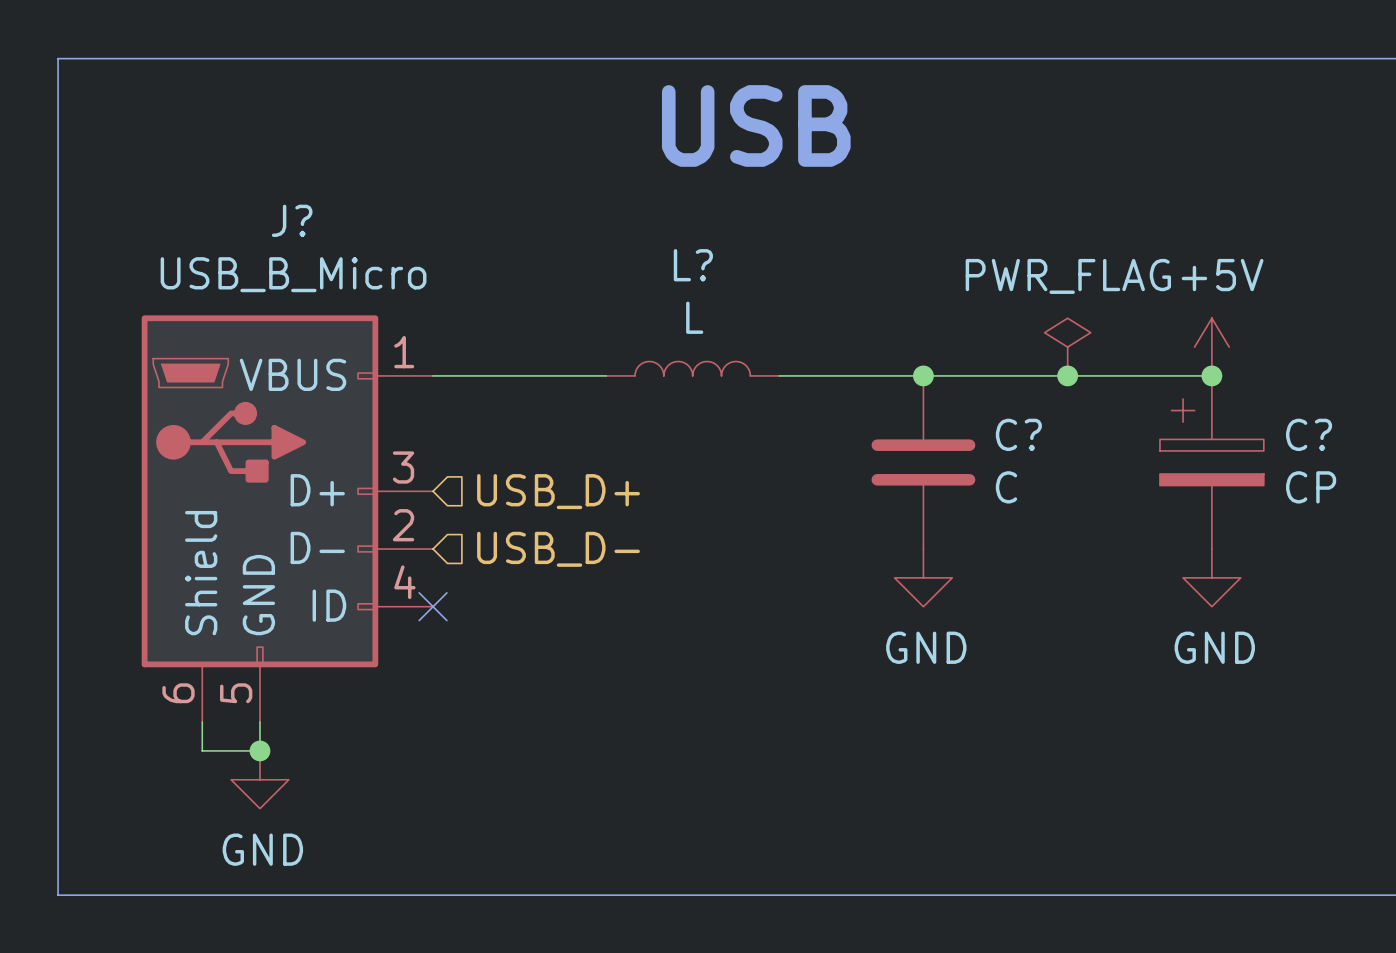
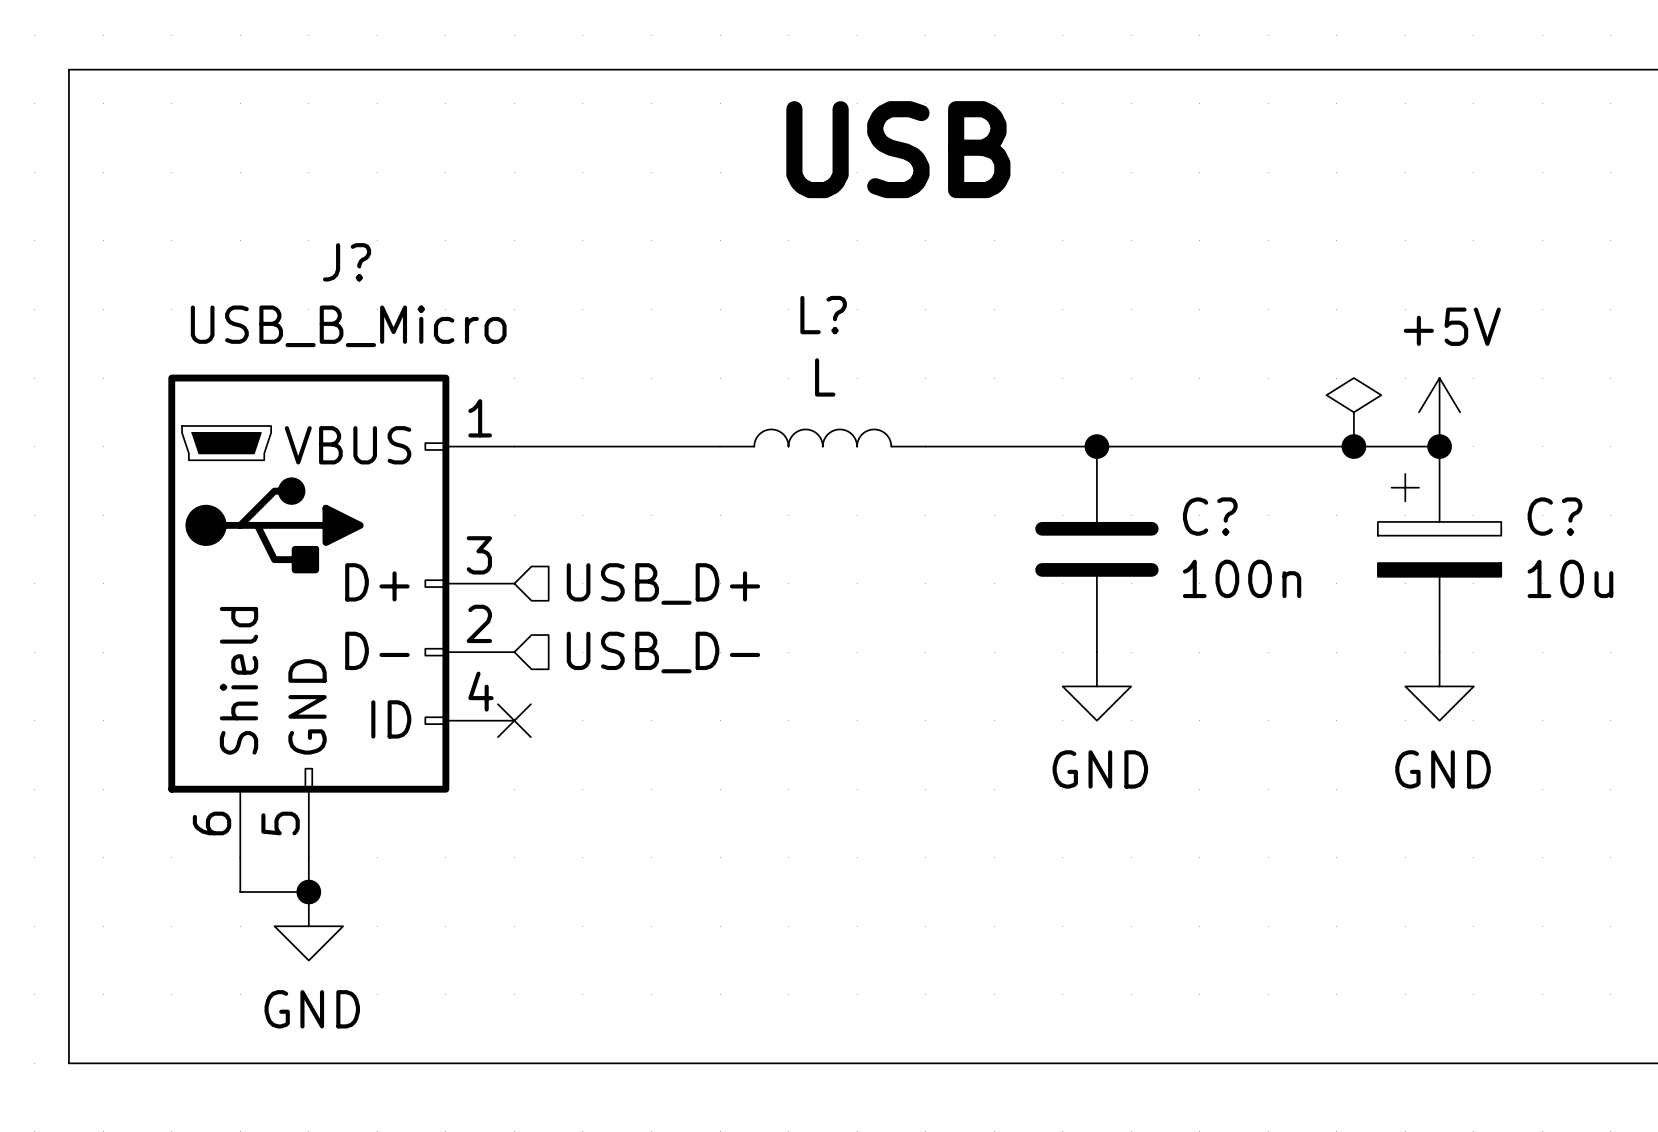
power symbol: PWR_FLAG (1067, 347) -> none
power symbol: none -> (1353, 412)
junction position: (1067, 375) -> (1353, 446)
C? value: C (1006, 487) -> 100n (1242, 578)
C? value: CP (1311, 487) -> 10u (1570, 578)

